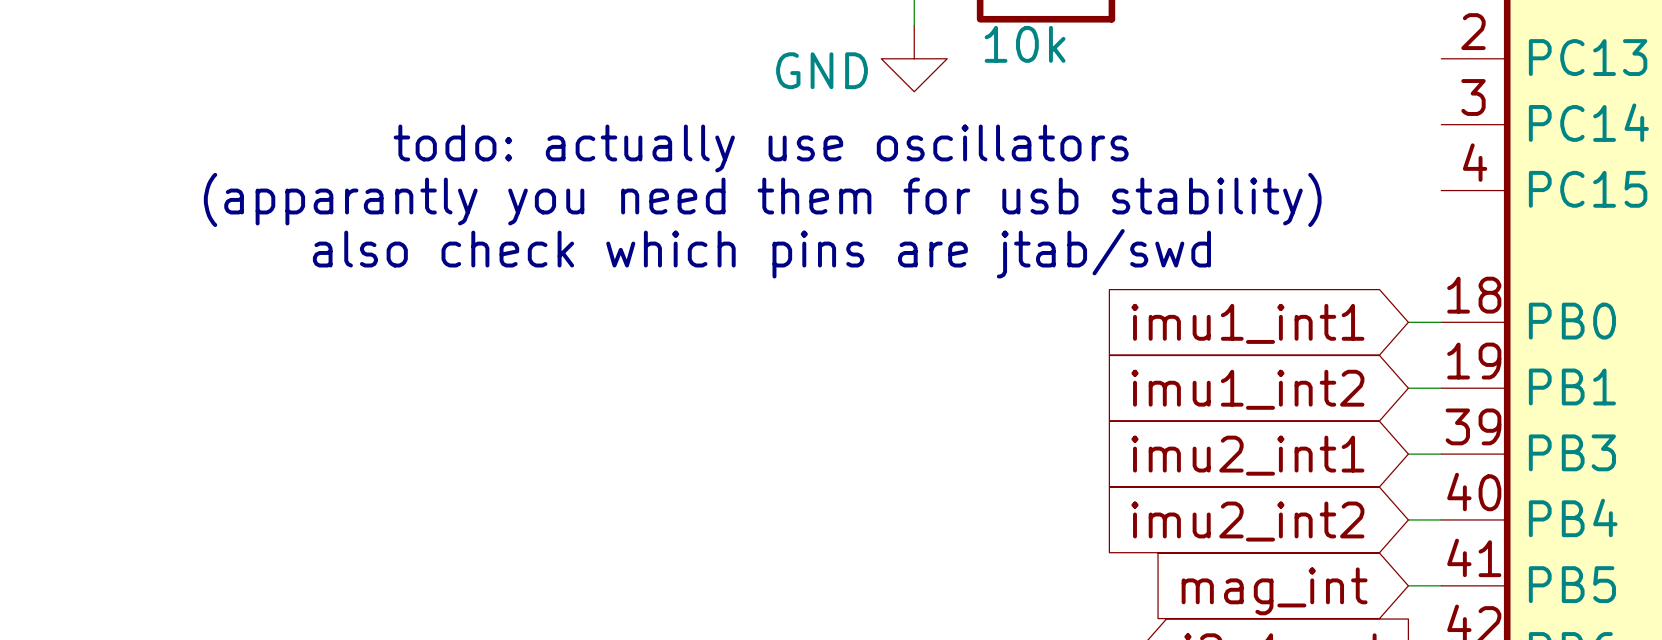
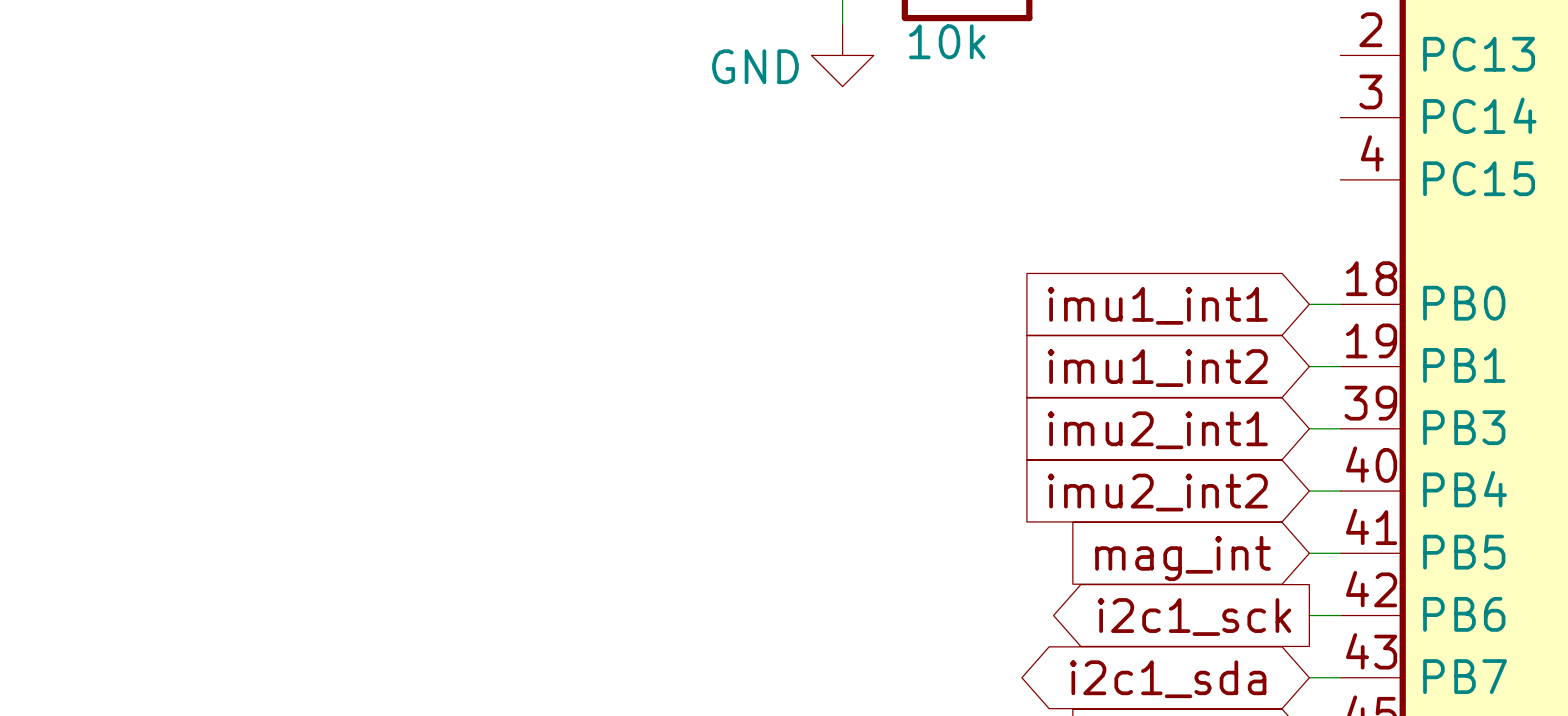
text: todo: actually use oscillators (761, 148) -> none
text: (apparantly you need them for usb stability) (762, 199) -> none
text: also check which pins are jtab/swd (761, 253) -> none

